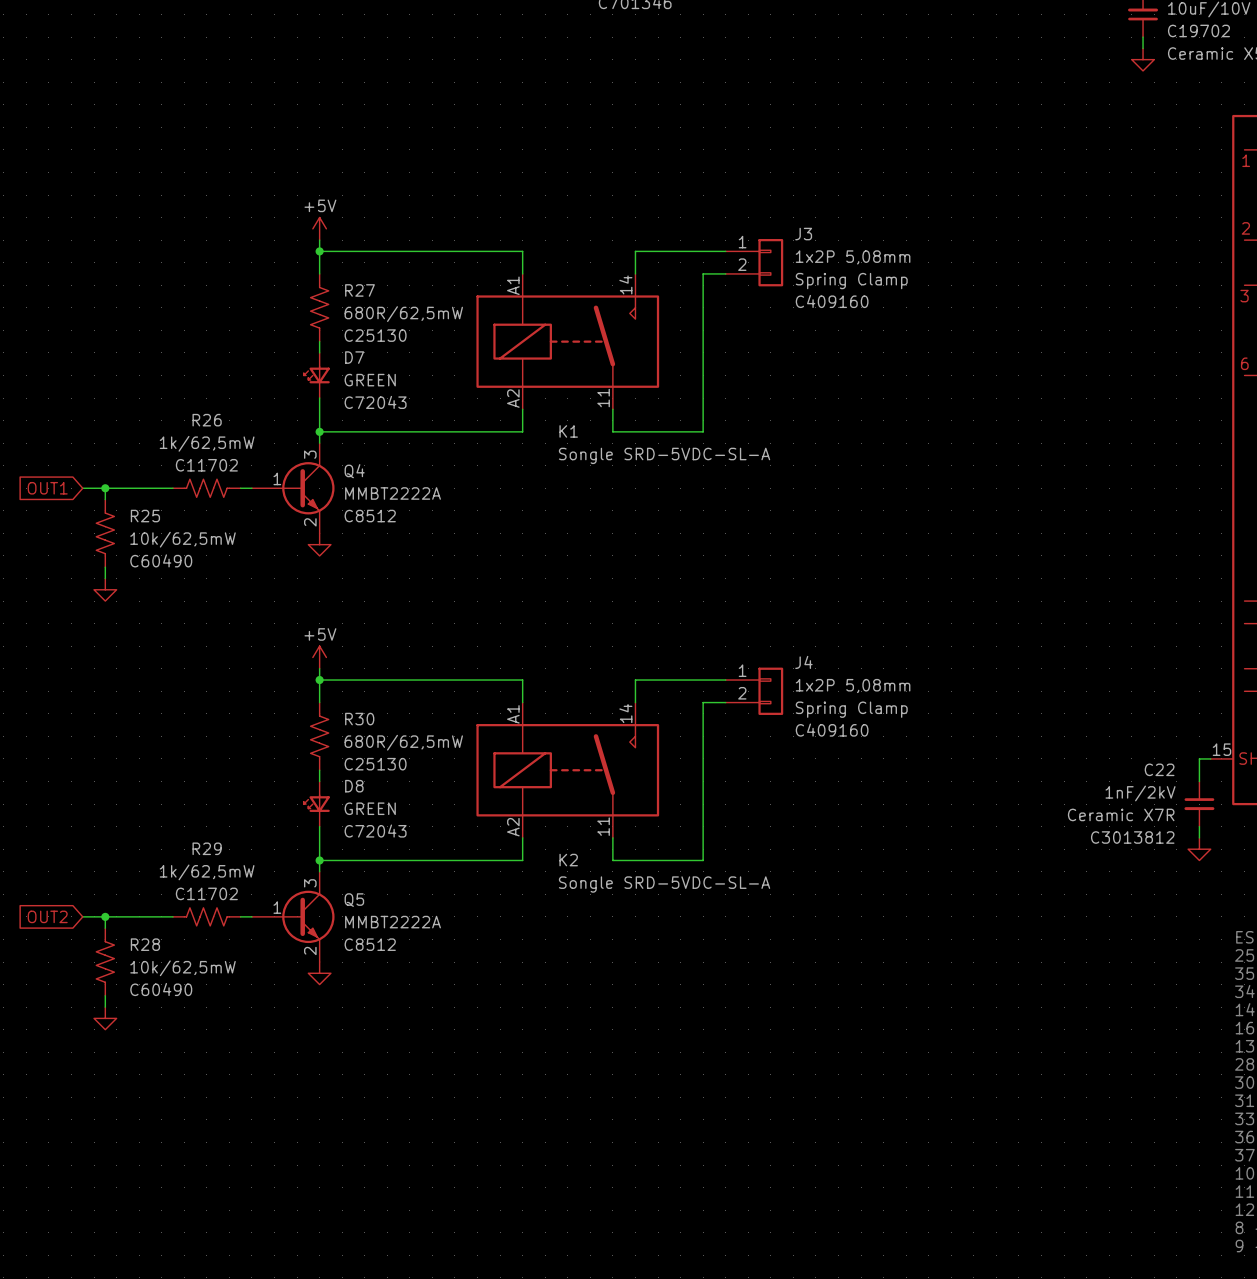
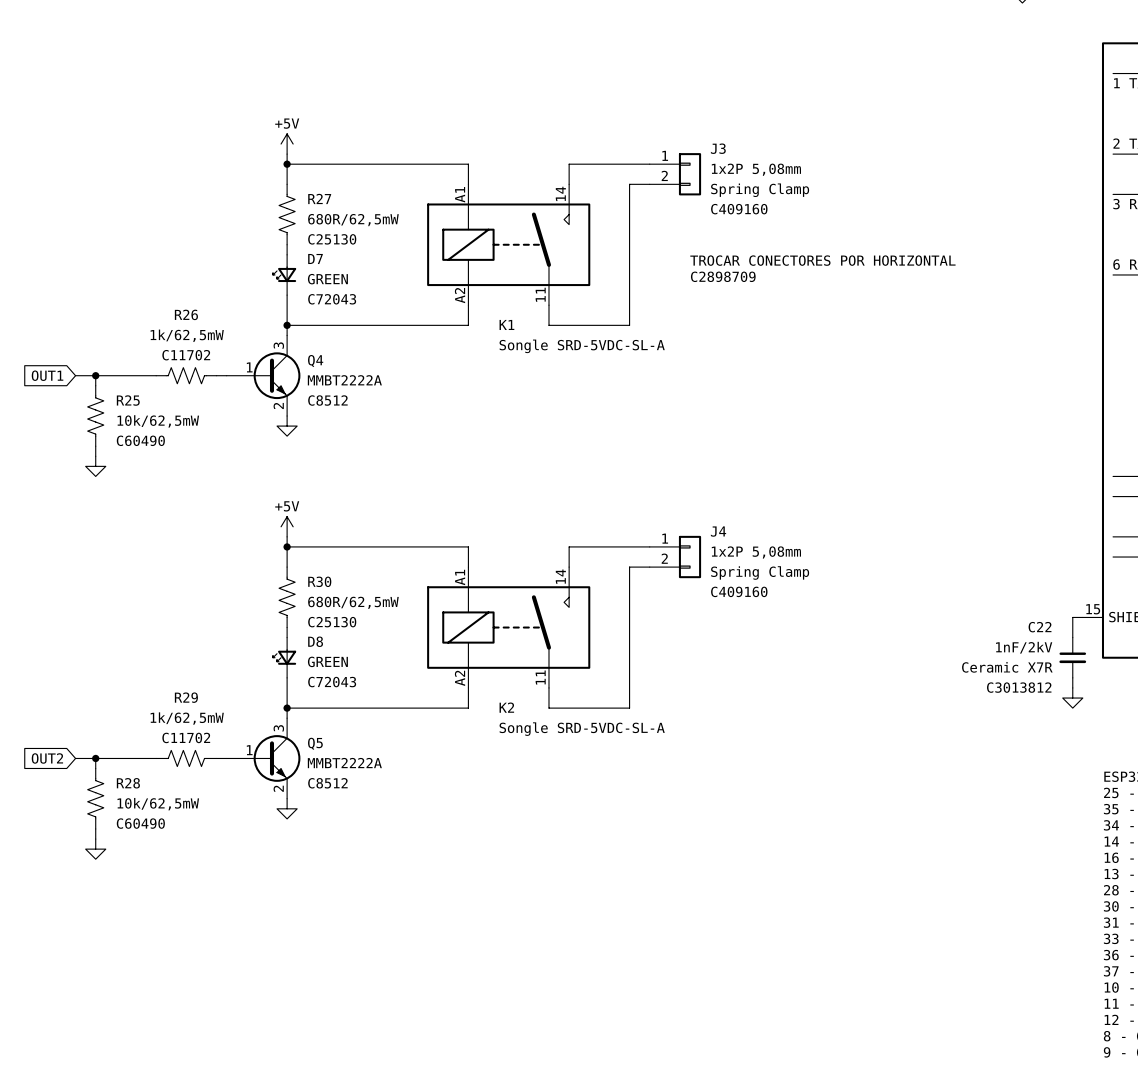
text: none -> TROCAR CONECTORES POR HORIZONTAL (822, 260)
text: none -> C2898709 (723, 276)

